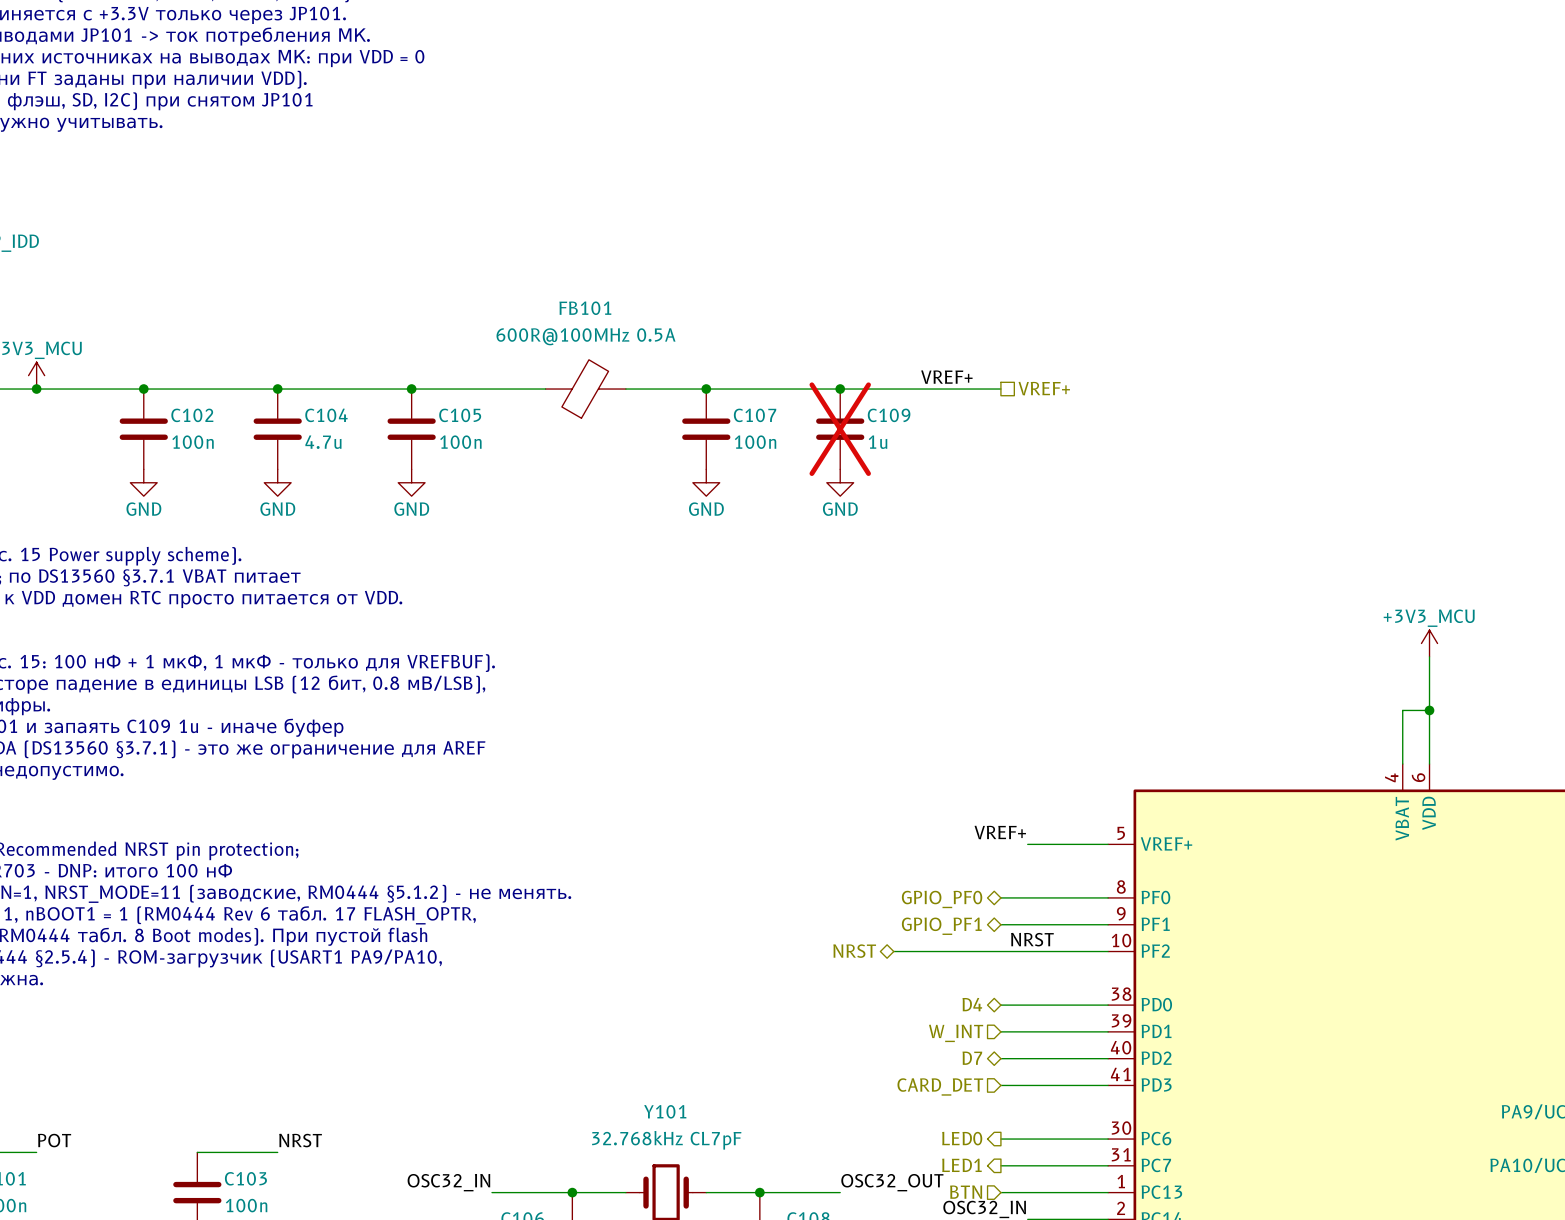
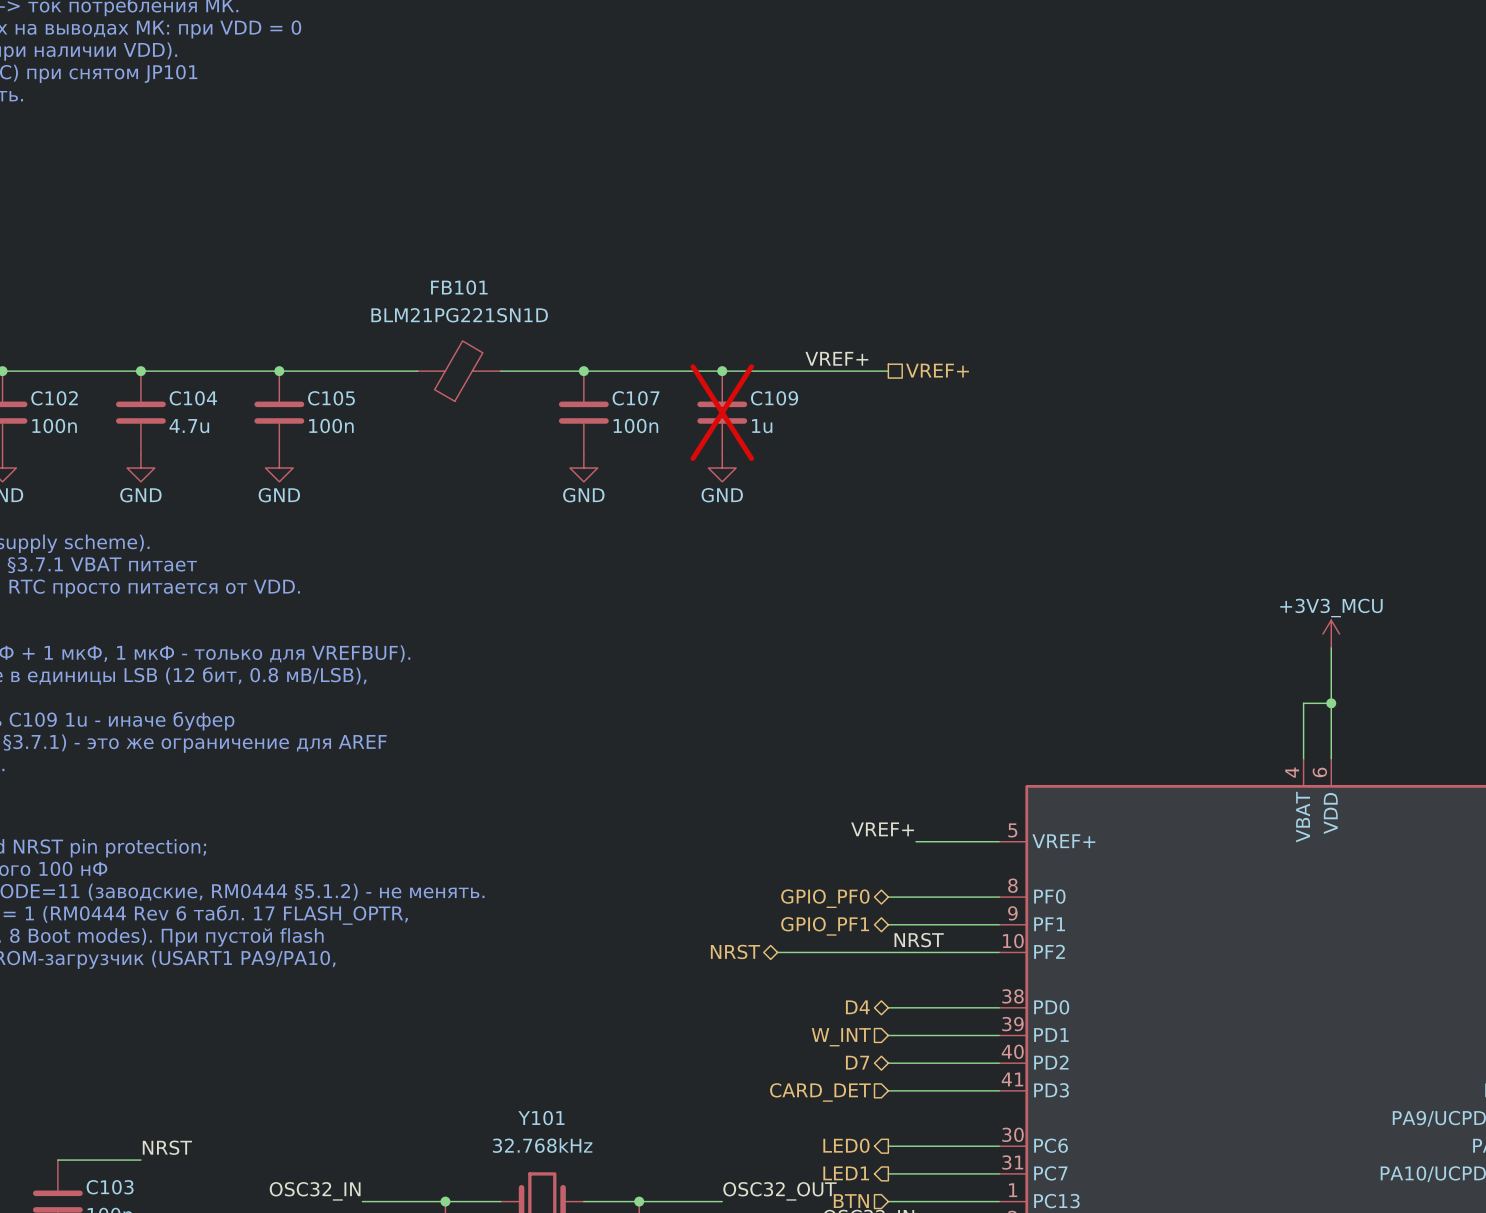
FB101 value: 600R@100MHz 0.5A (586, 336) -> BLM21PG221SN1D (459, 315)
Y101 value: 32.768kHz CL7pF (666, 1140) -> 32.768kHz (542, 1145)

